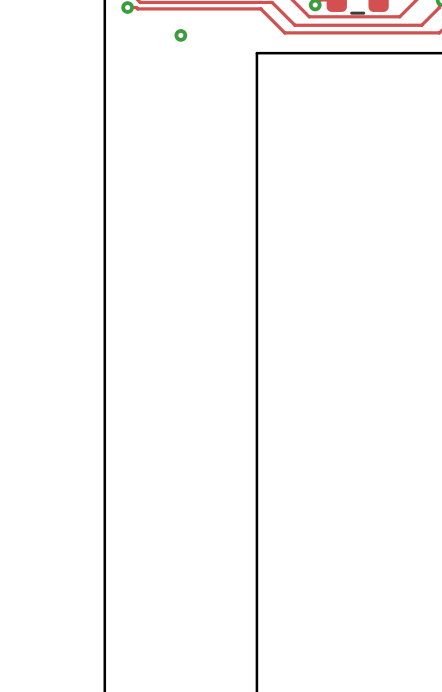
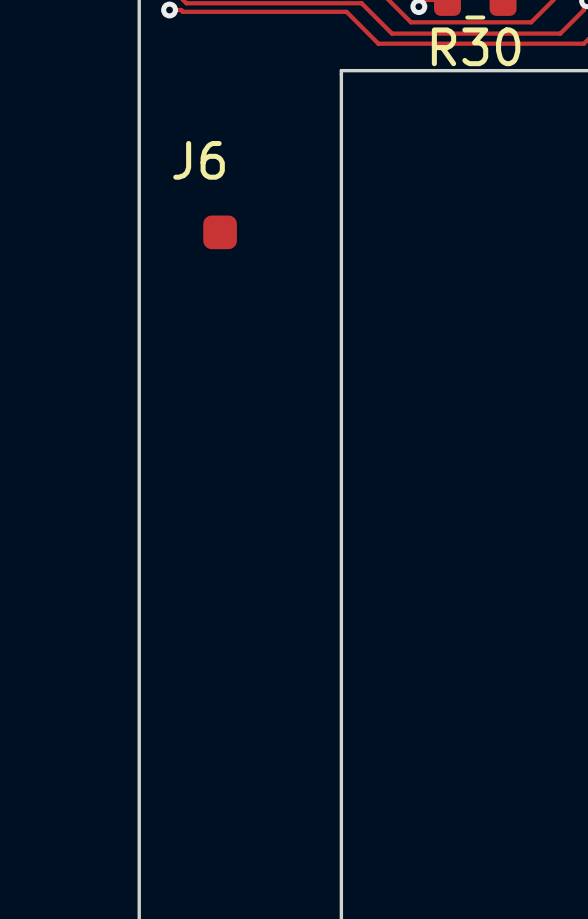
via: (180, 35) -> none
R30 name: none -> R30 (476, 46)
J6: none -> (220, 232)

